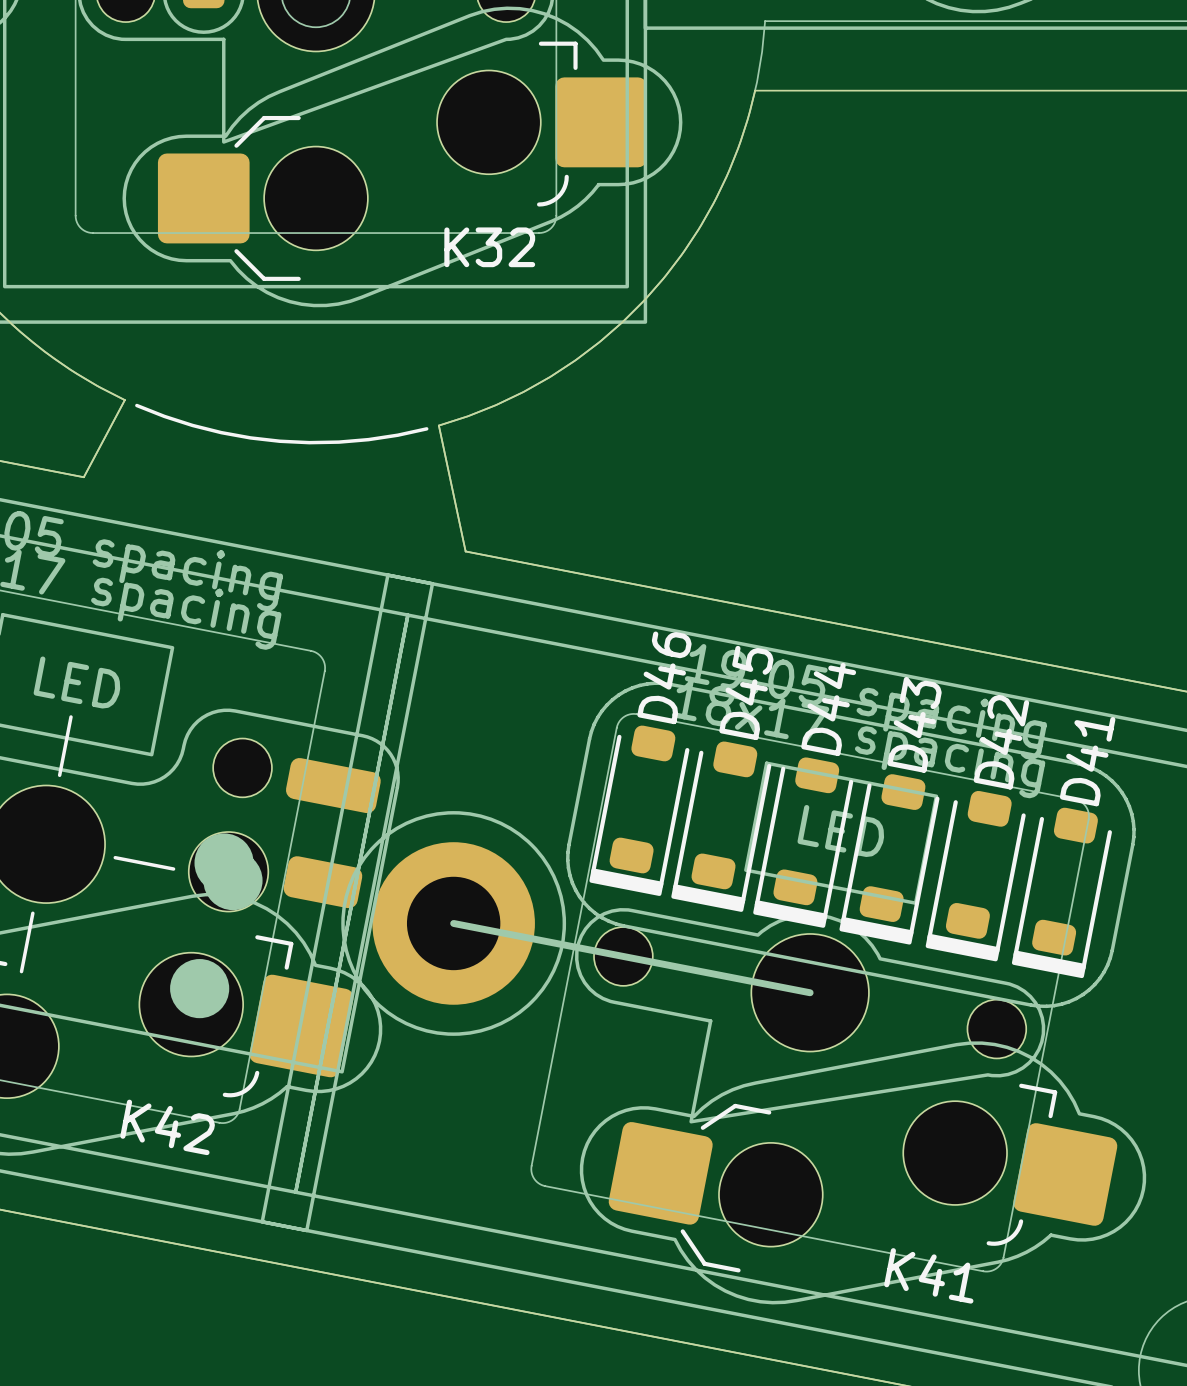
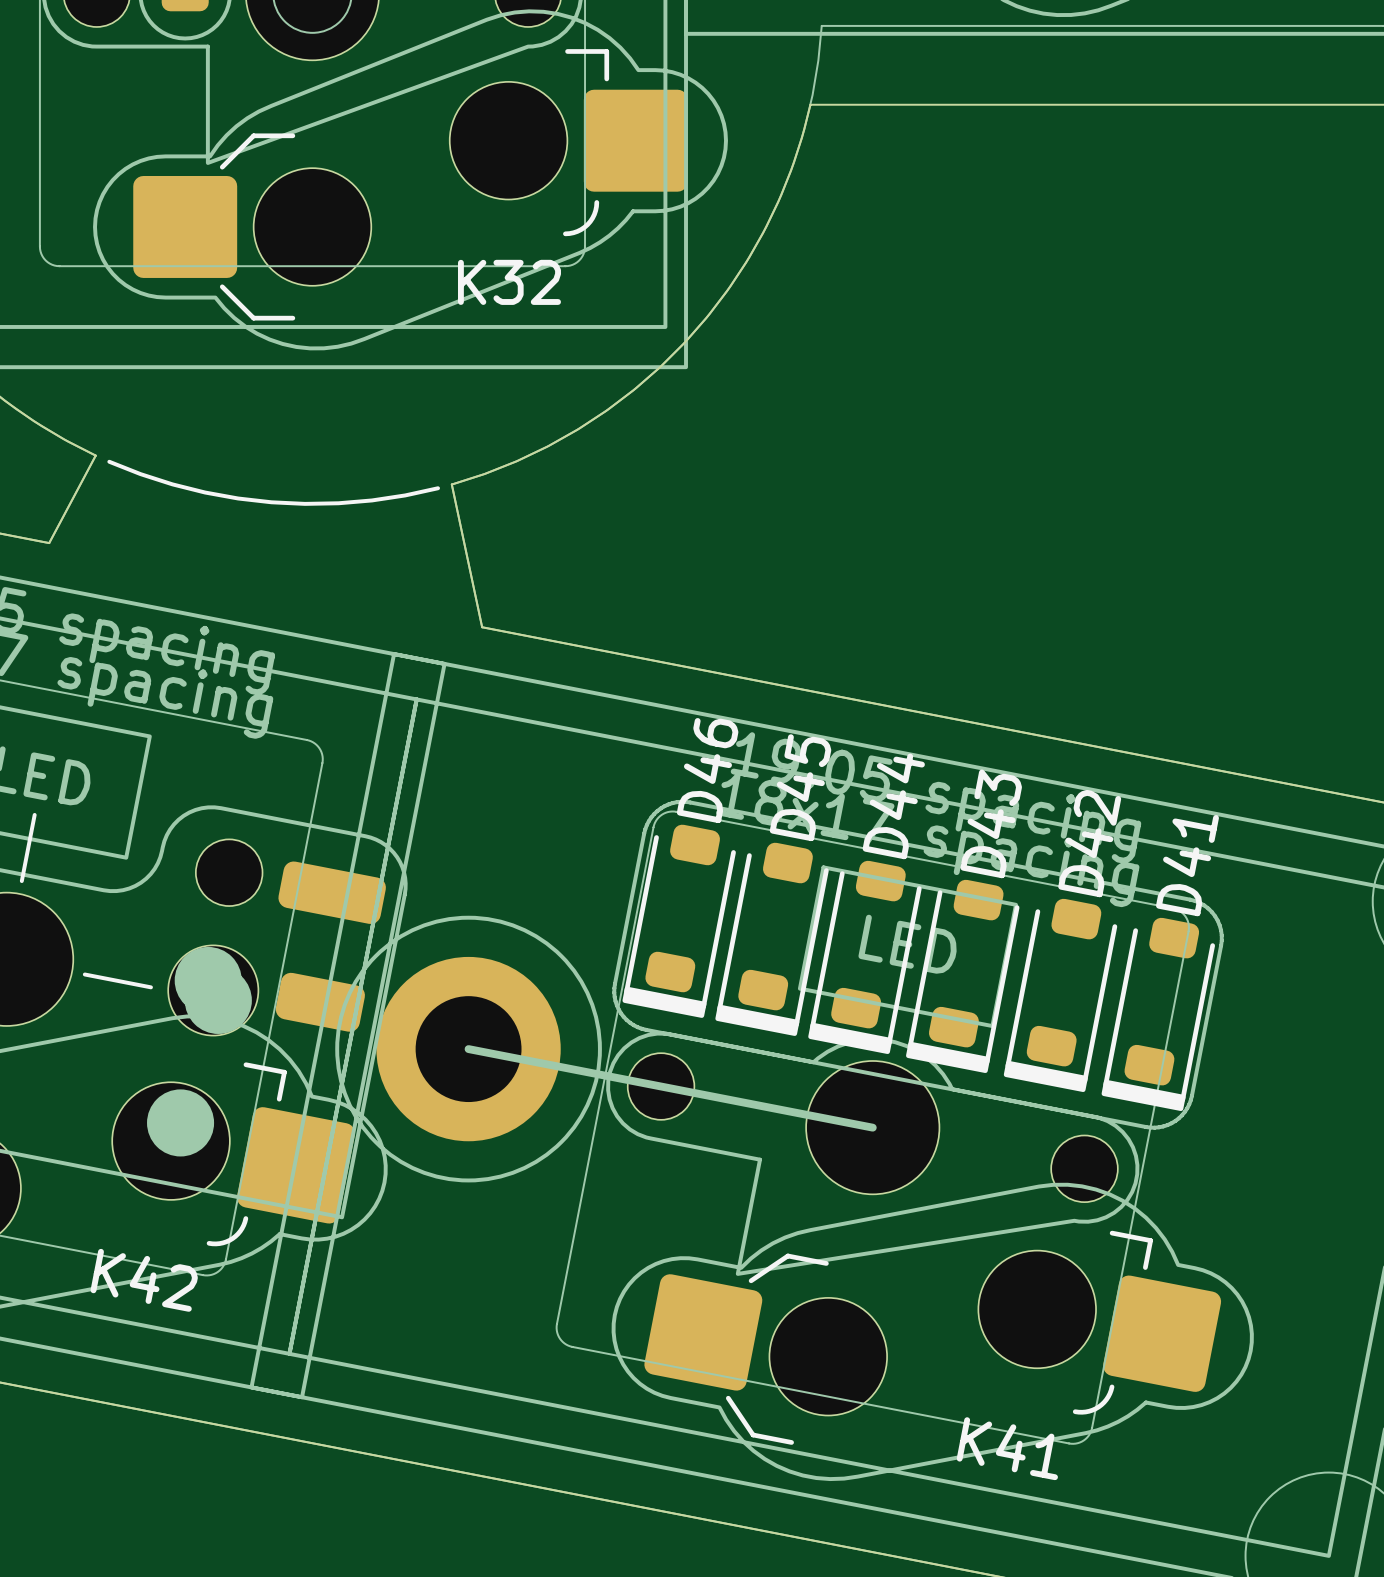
line: (655, 683) (670, 684) (1078, 763) (1099, 771) (1112, 781) (1126, 799) (1131, 813) (1134, 829) (1132, 844) (1112, 950) (1104, 972) (1094, 984) (1076, 998) (1054, 1005) (1038, 1006) (623, 925) (602, 917) (589, 908) (579, 896) (569, 875) (567, 860) (568, 844) (589, 739) (597, 717) (612, 699) (632, 687) (655, 683) -> (681, 801) (668, 804) (657, 811) (648, 821) (644, 833) (614, 988) (618, 1009) (633, 1025) (646, 1029) (1145, 1127) (1167, 1125) (1178, 1118) (1187, 1108) (1191, 1095) (1221, 940) (1217, 920) (1204, 905) (1190, 899) (681, 801)
part footprint: [341, 811, 567, 1036] -> [335, 915, 602, 1183]

